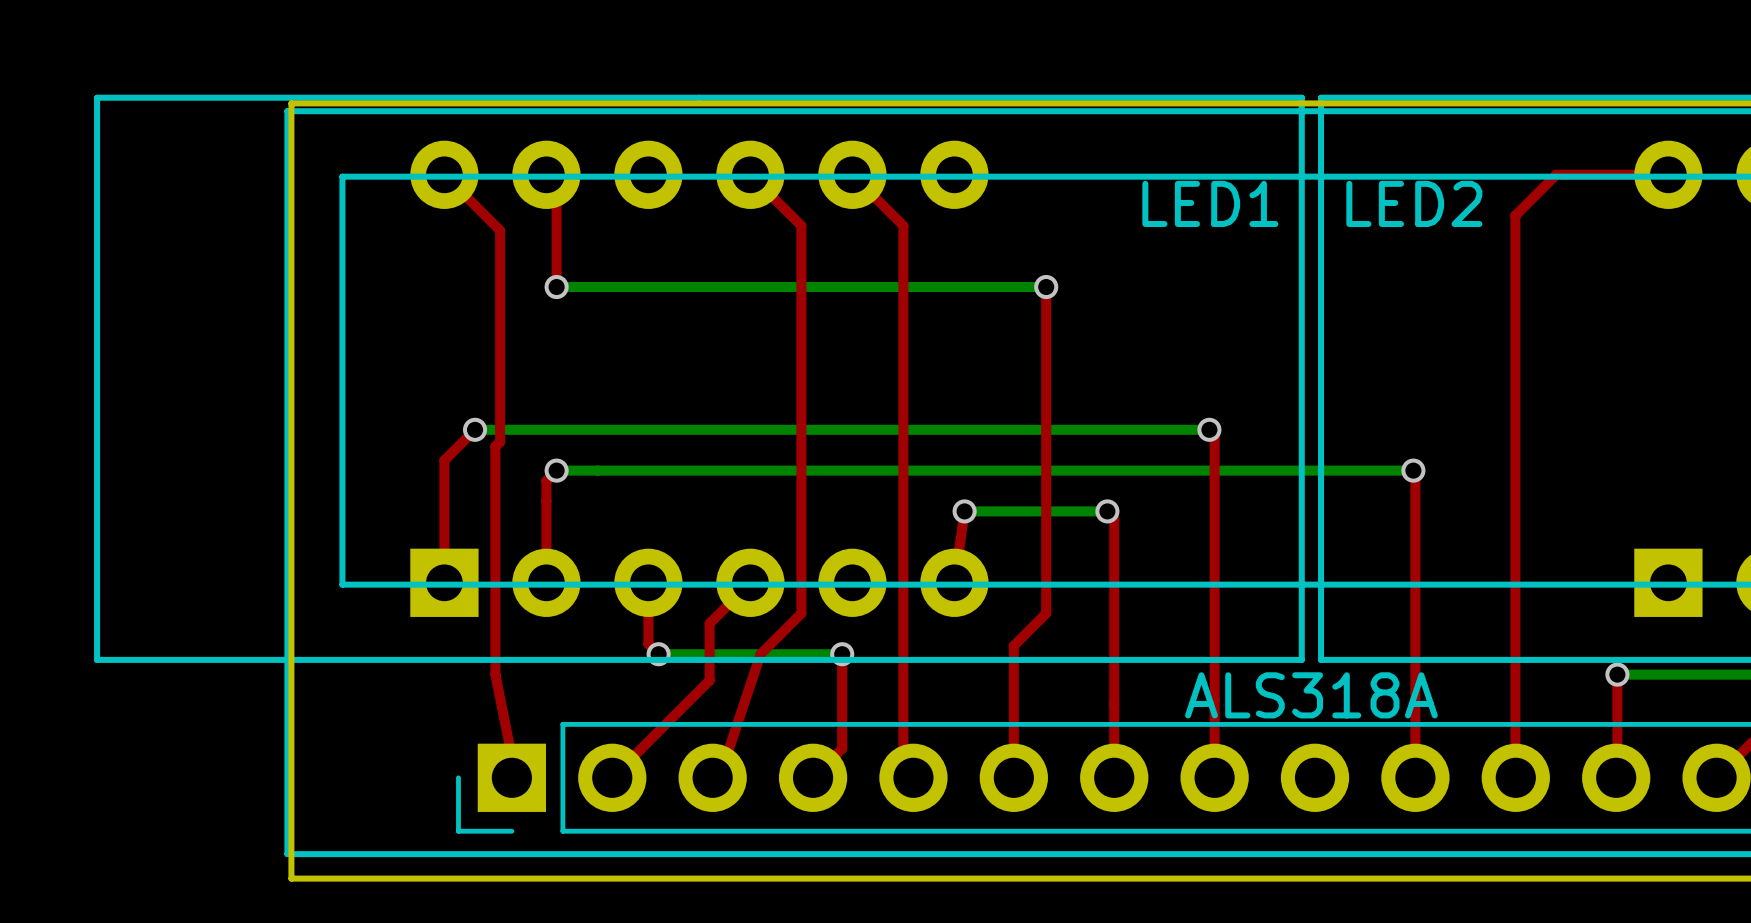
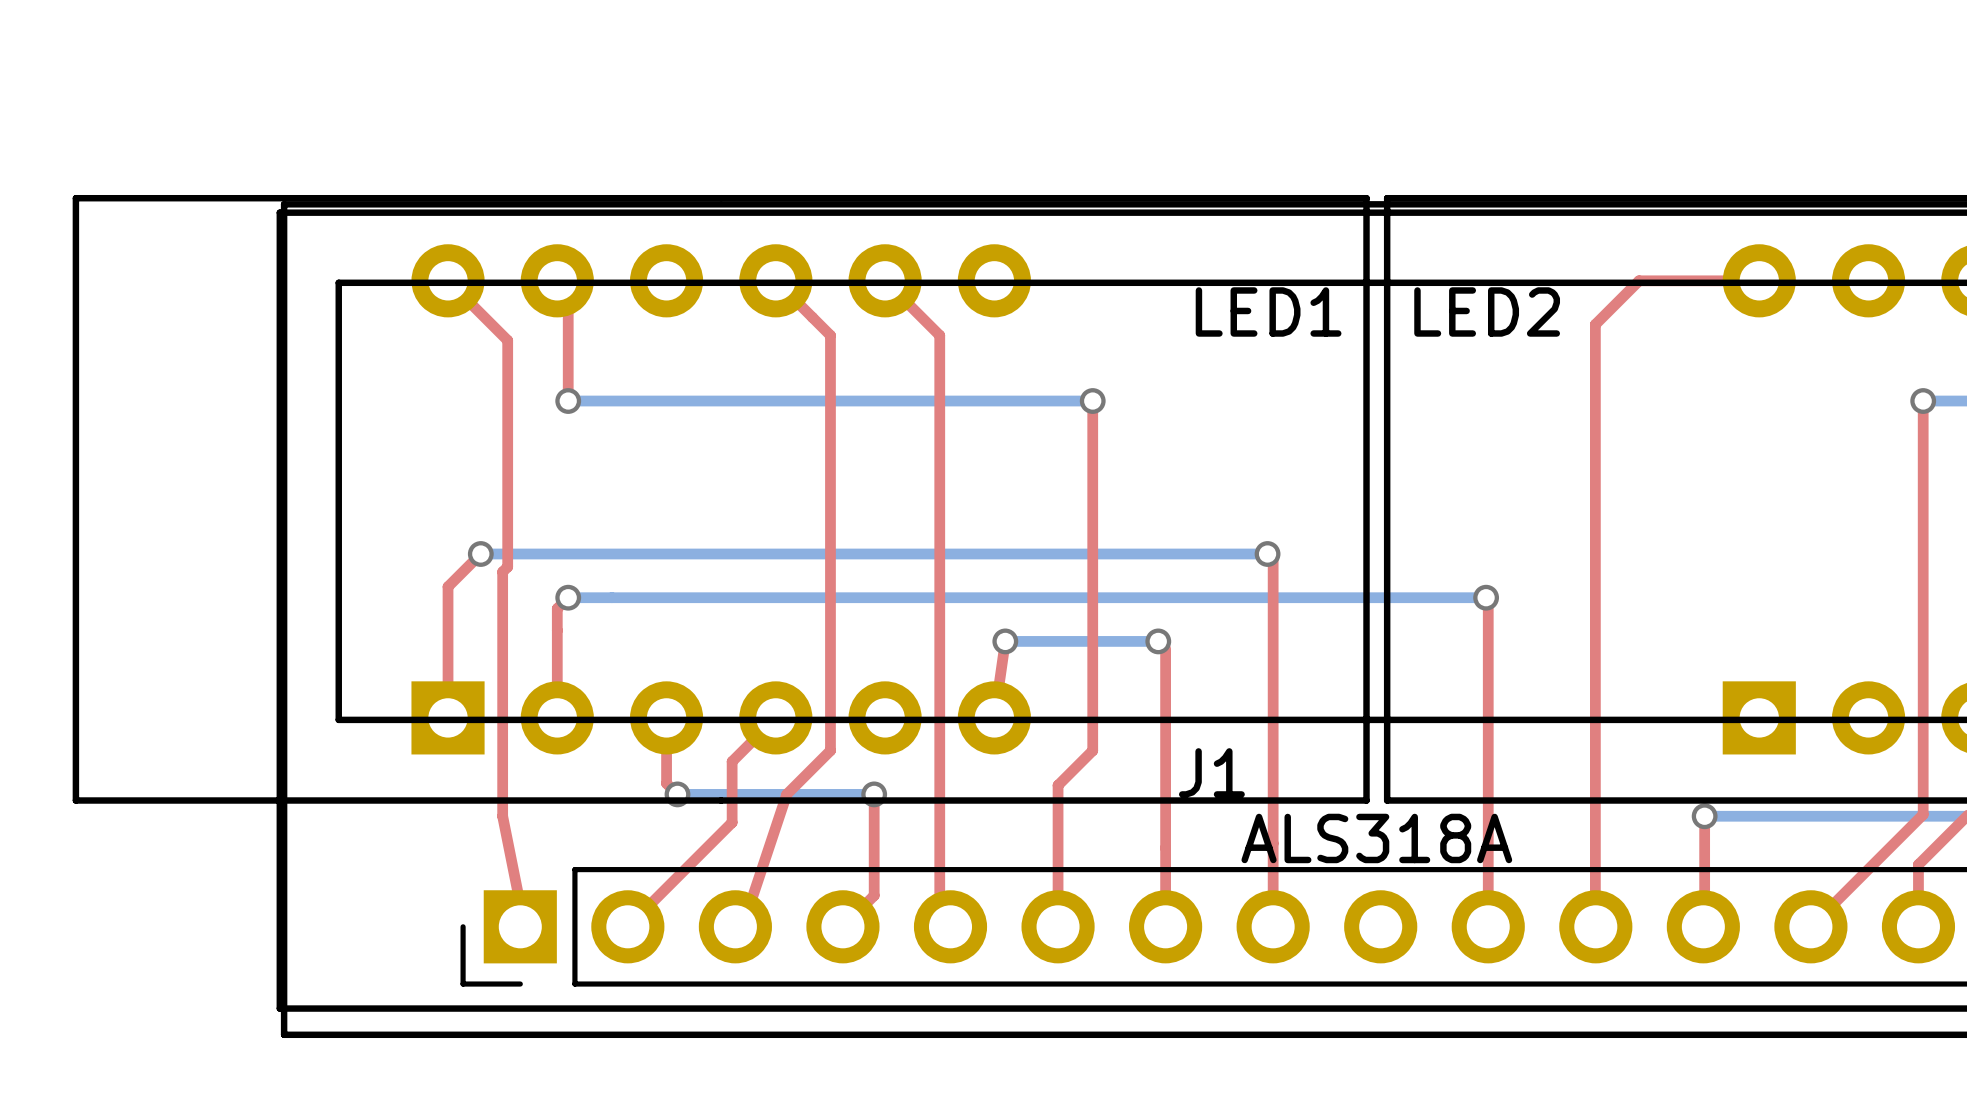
J1 name: none -> J1 (1211, 772)

